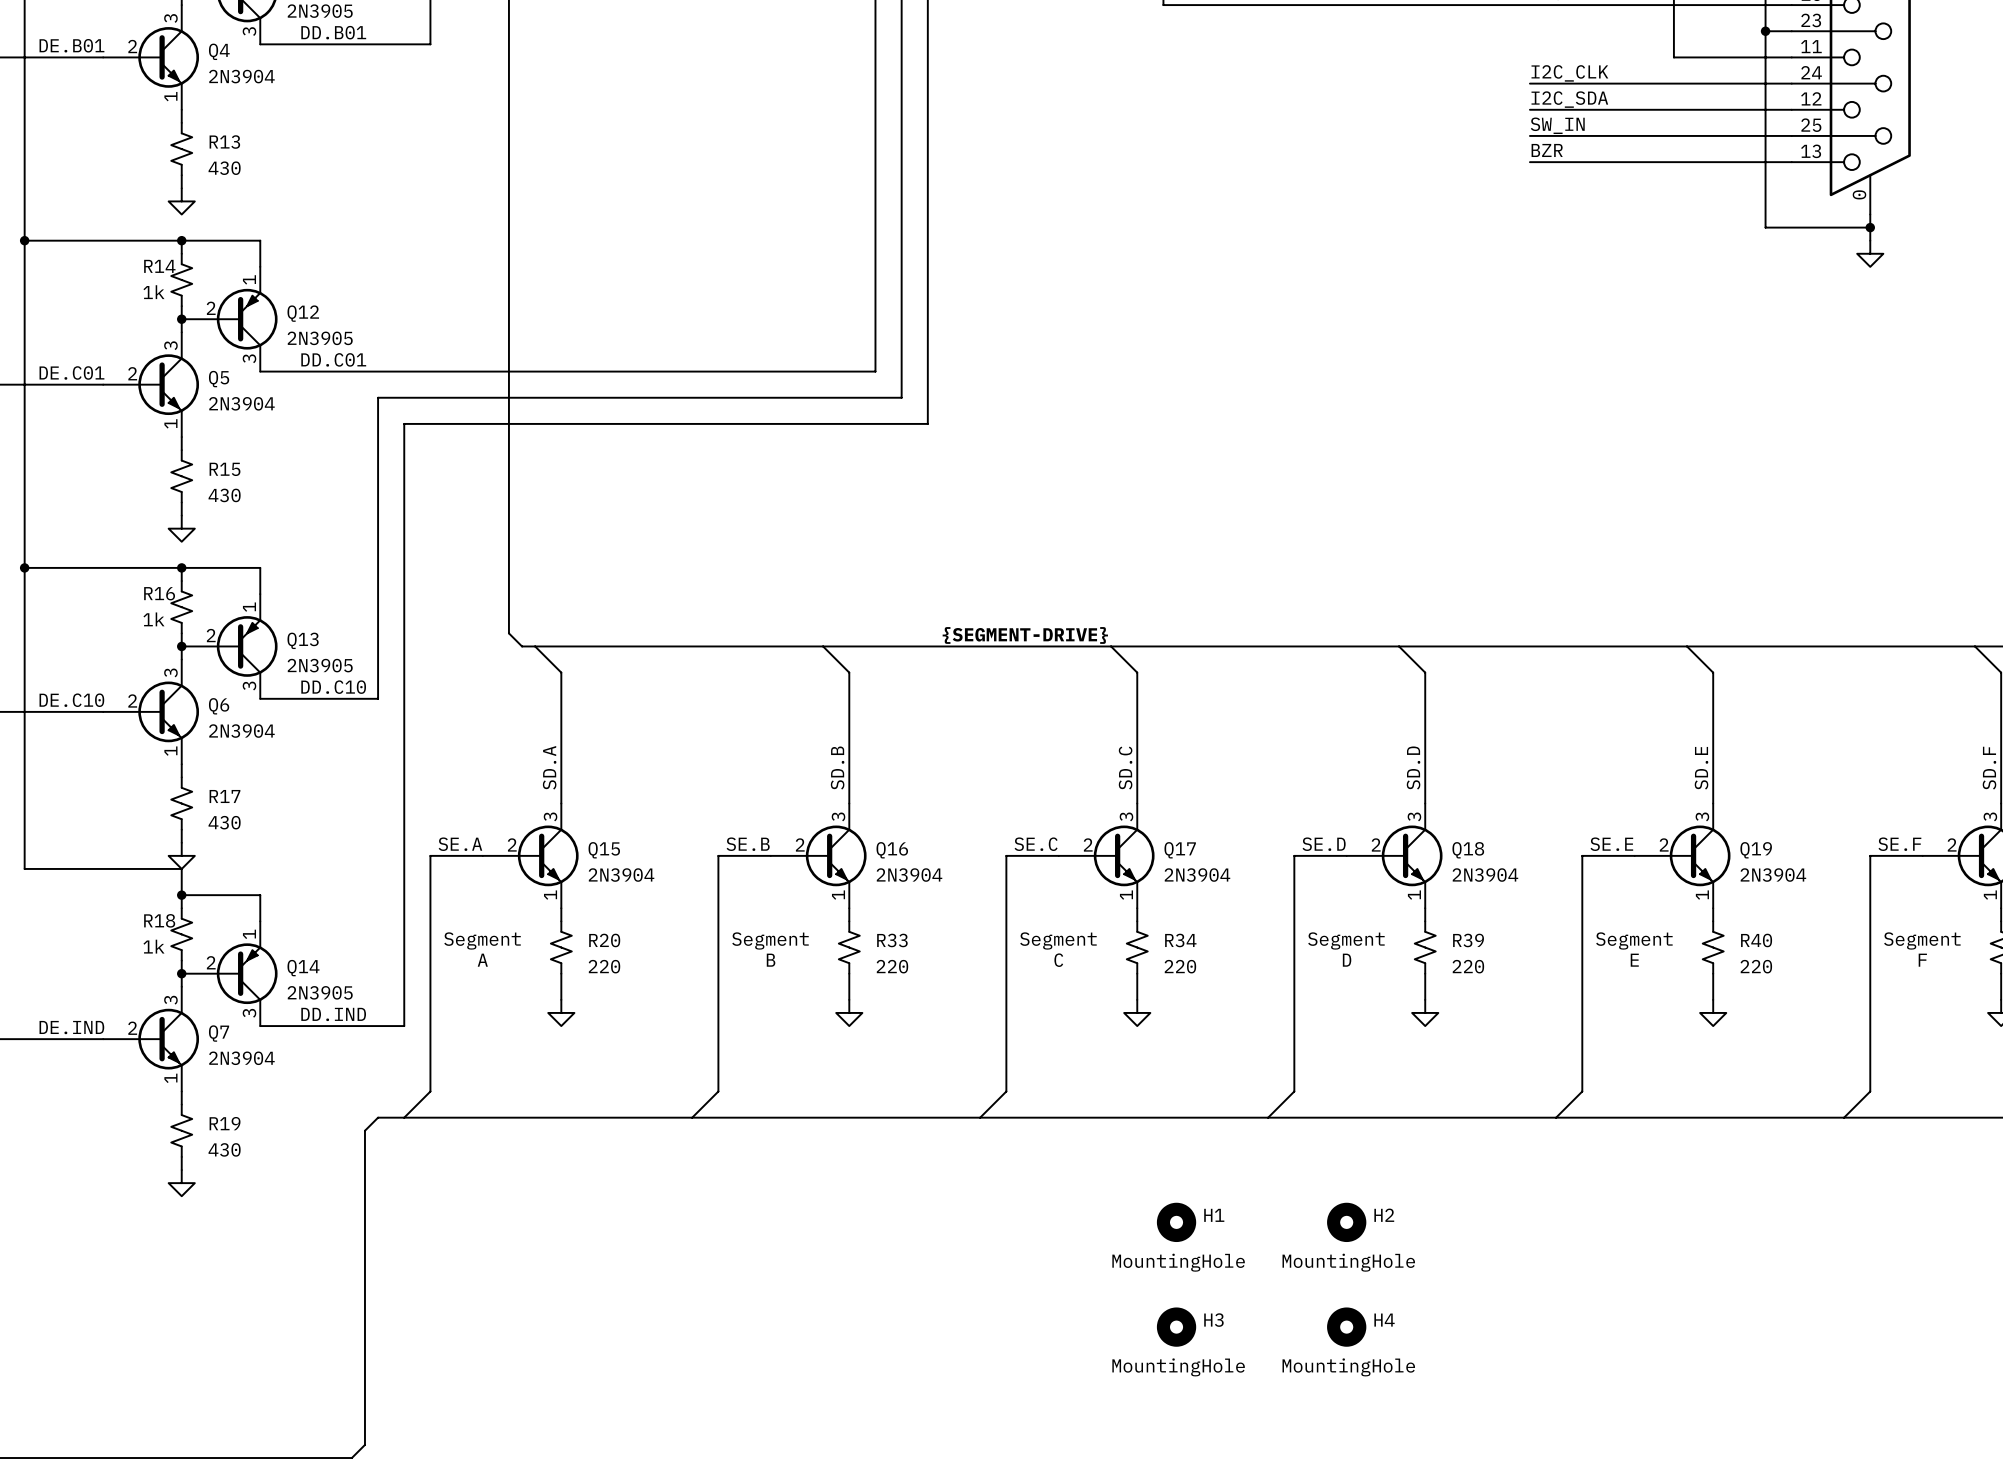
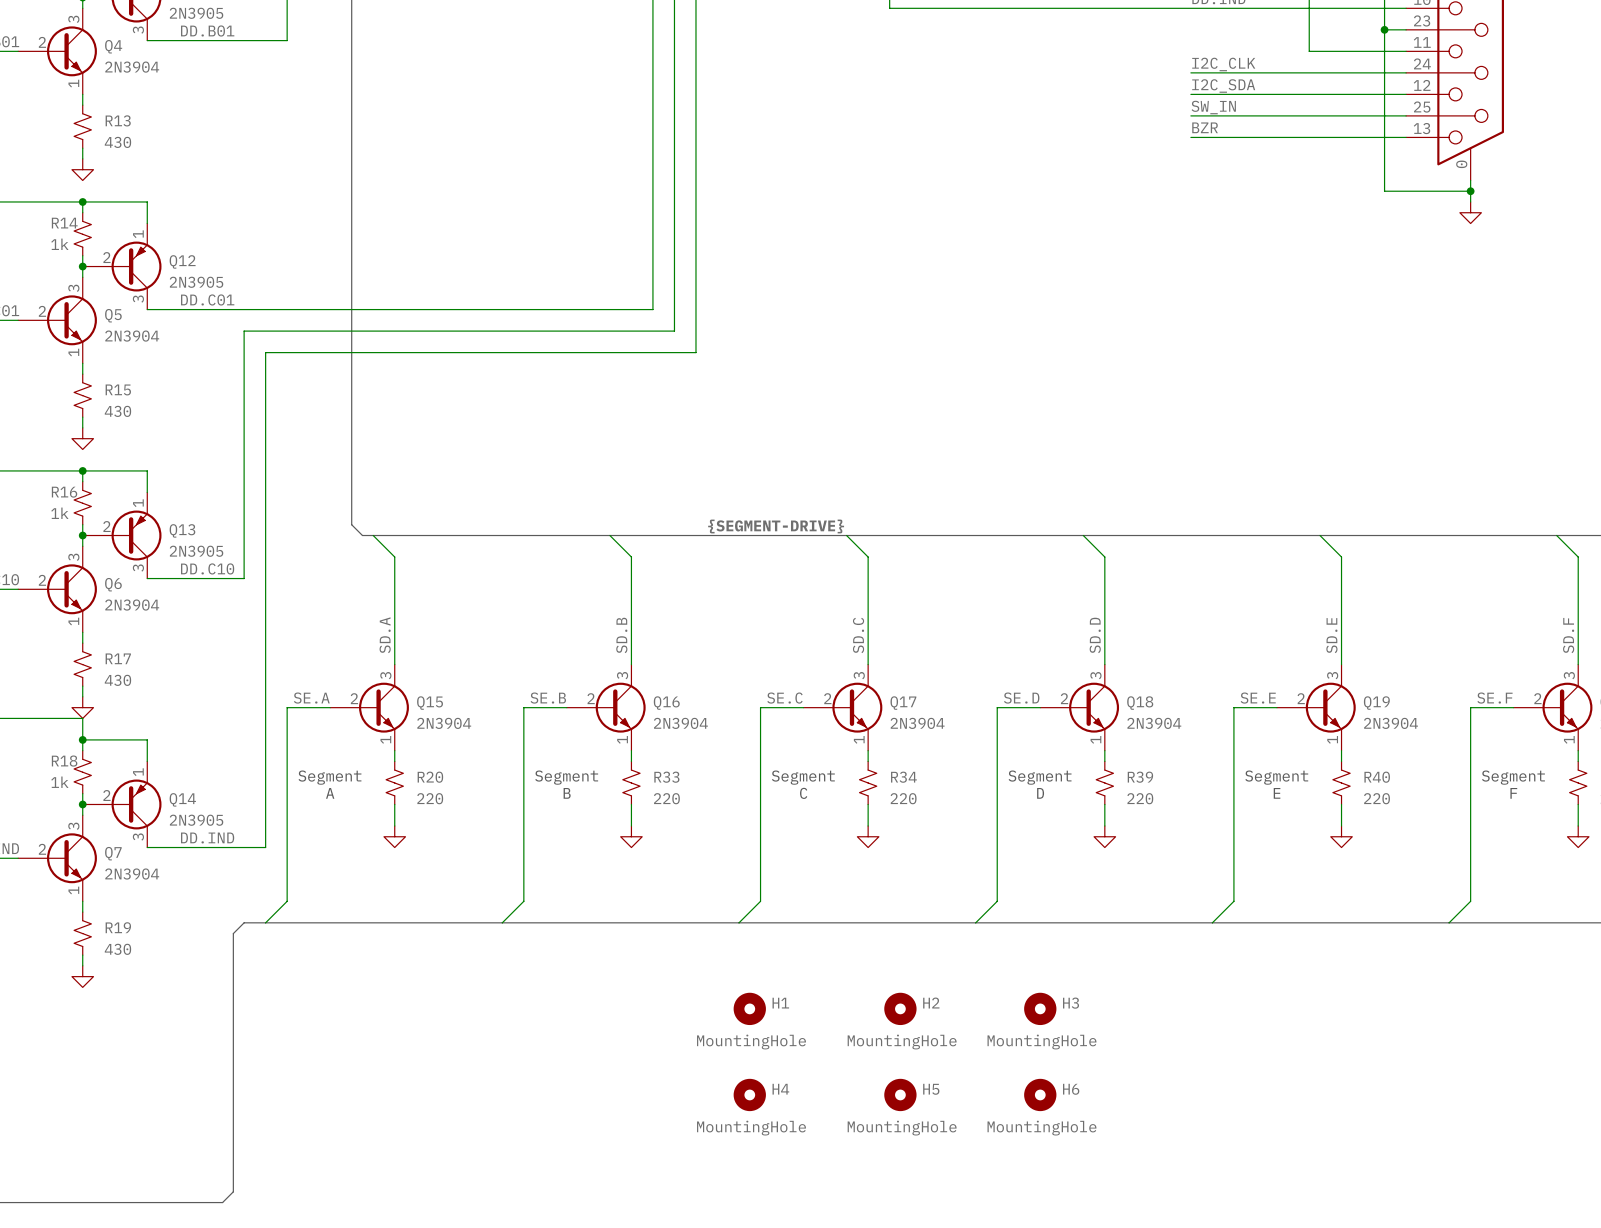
H1 name: H1 (1214, 1215) -> H2 (931, 1003)
H2 name: H2 (1384, 1215) -> H3 (1071, 1003)
H1: none -> MountingHole (749, 1008)
H3 name: H3 (1213, 1320) -> H5 (931, 1089)
H4 name: H4 (1384, 1320) -> H6 (1071, 1089)
H4: none -> MountingHole (749, 1094)

